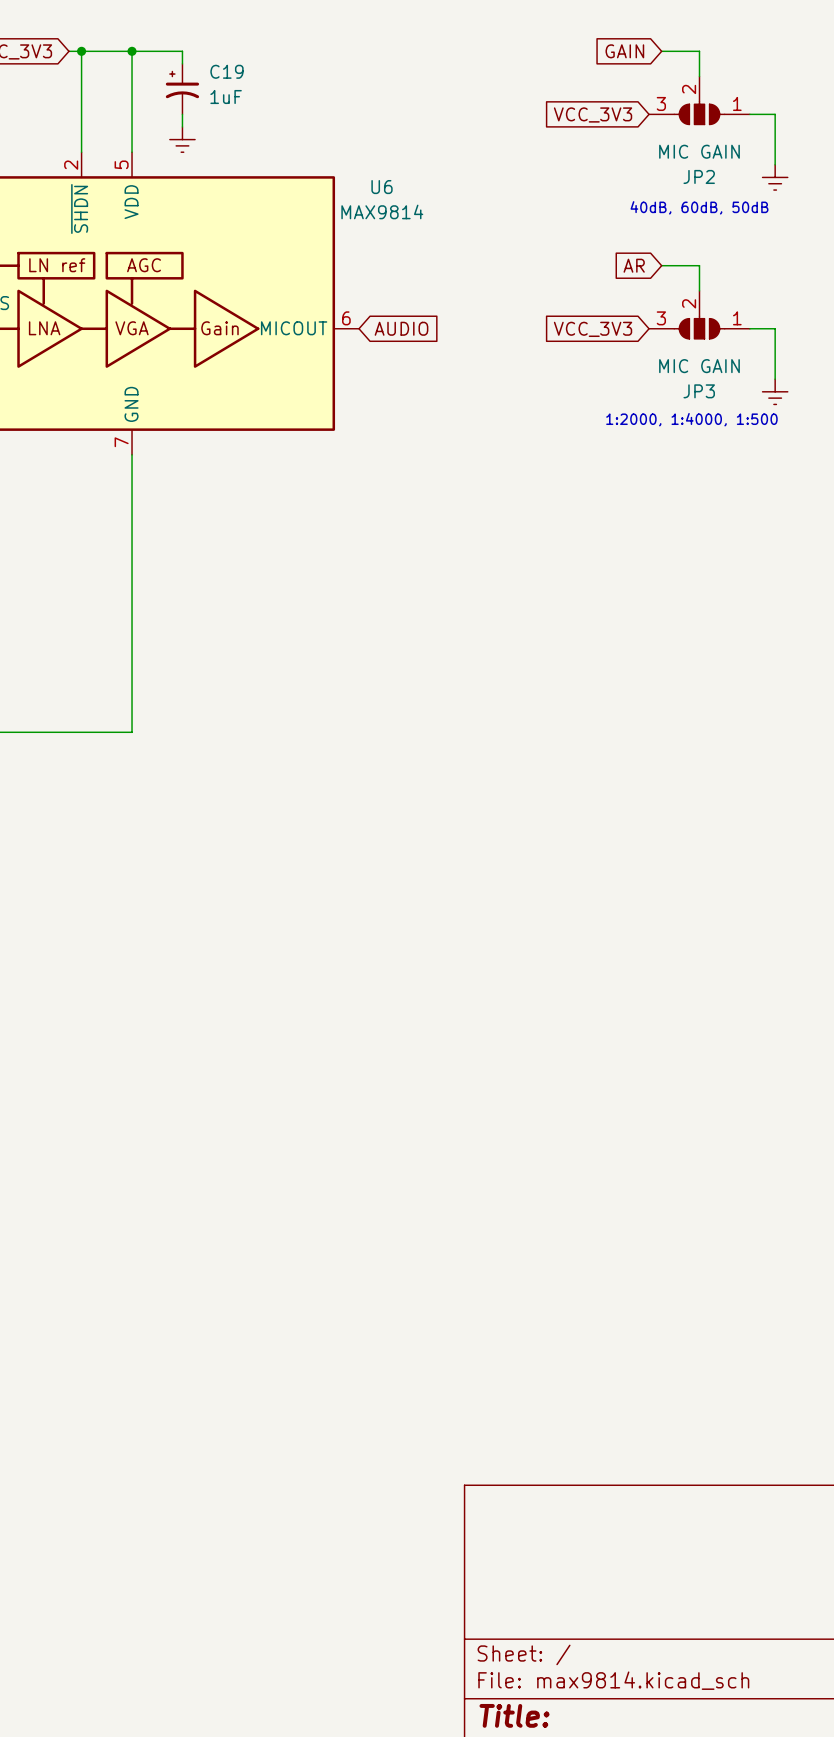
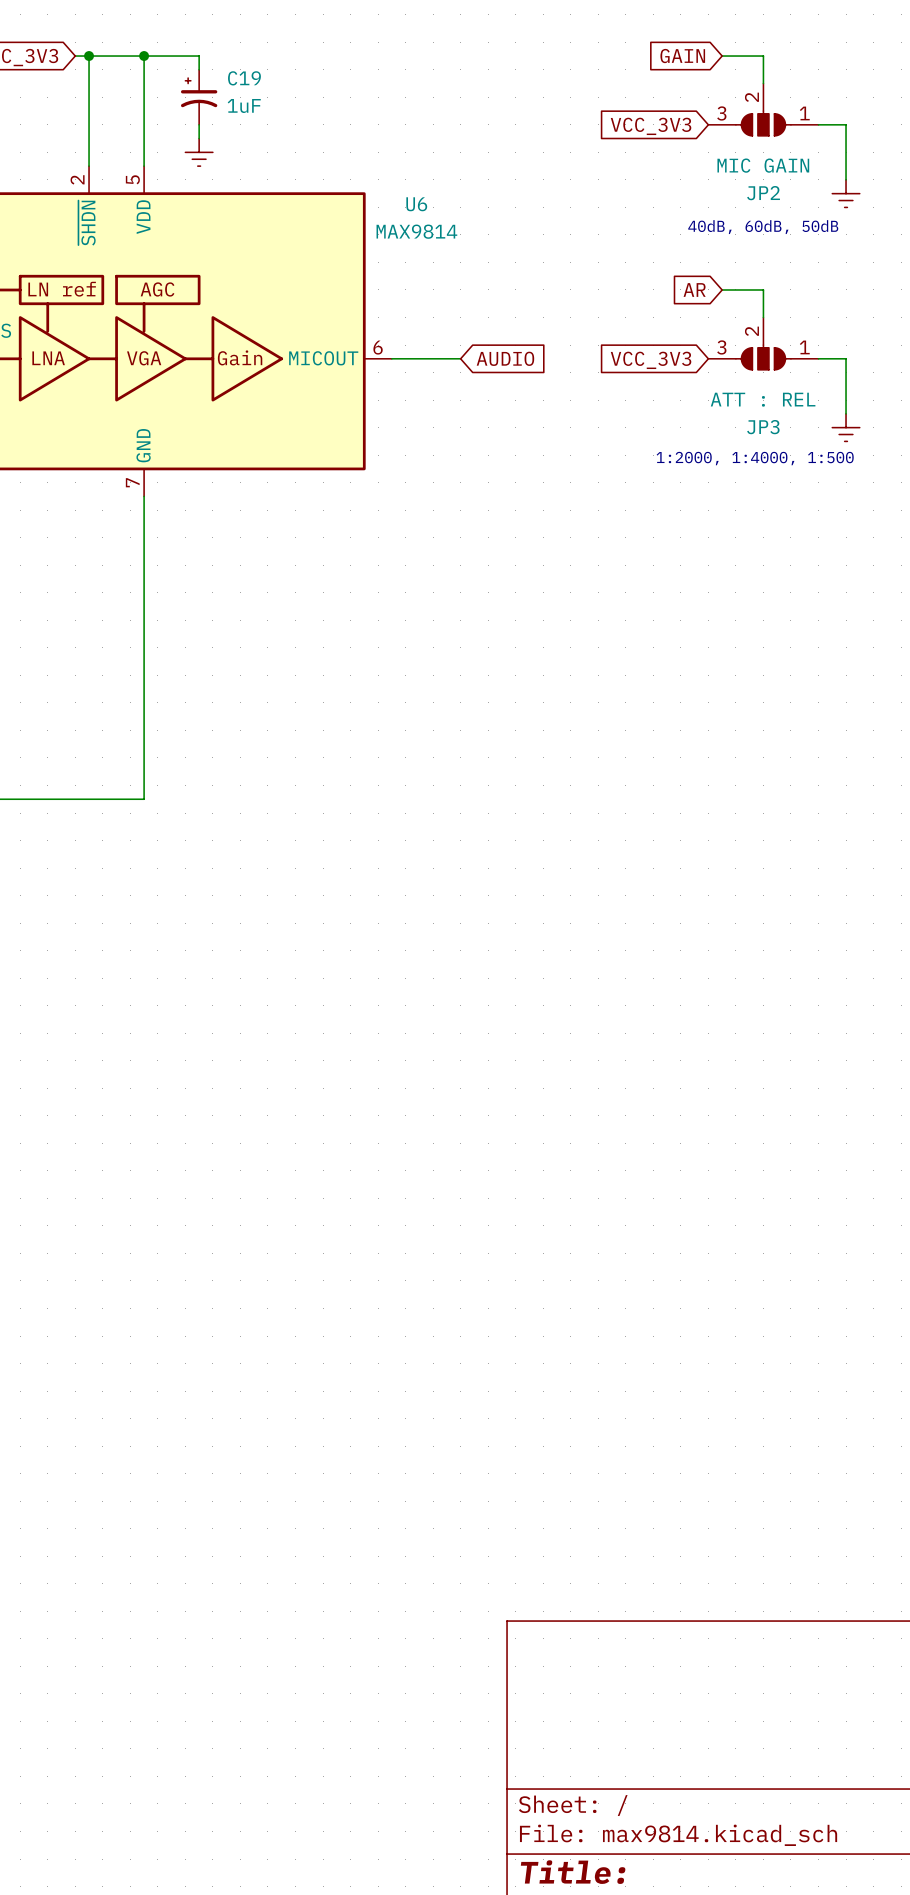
wire: none -> (391, 358) (460, 358)
global label position: AUDIO (401, 328) -> AUDIO (505, 358)
JP3 value: MIC GAIN (699, 366) -> ATT : REL (763, 399)

